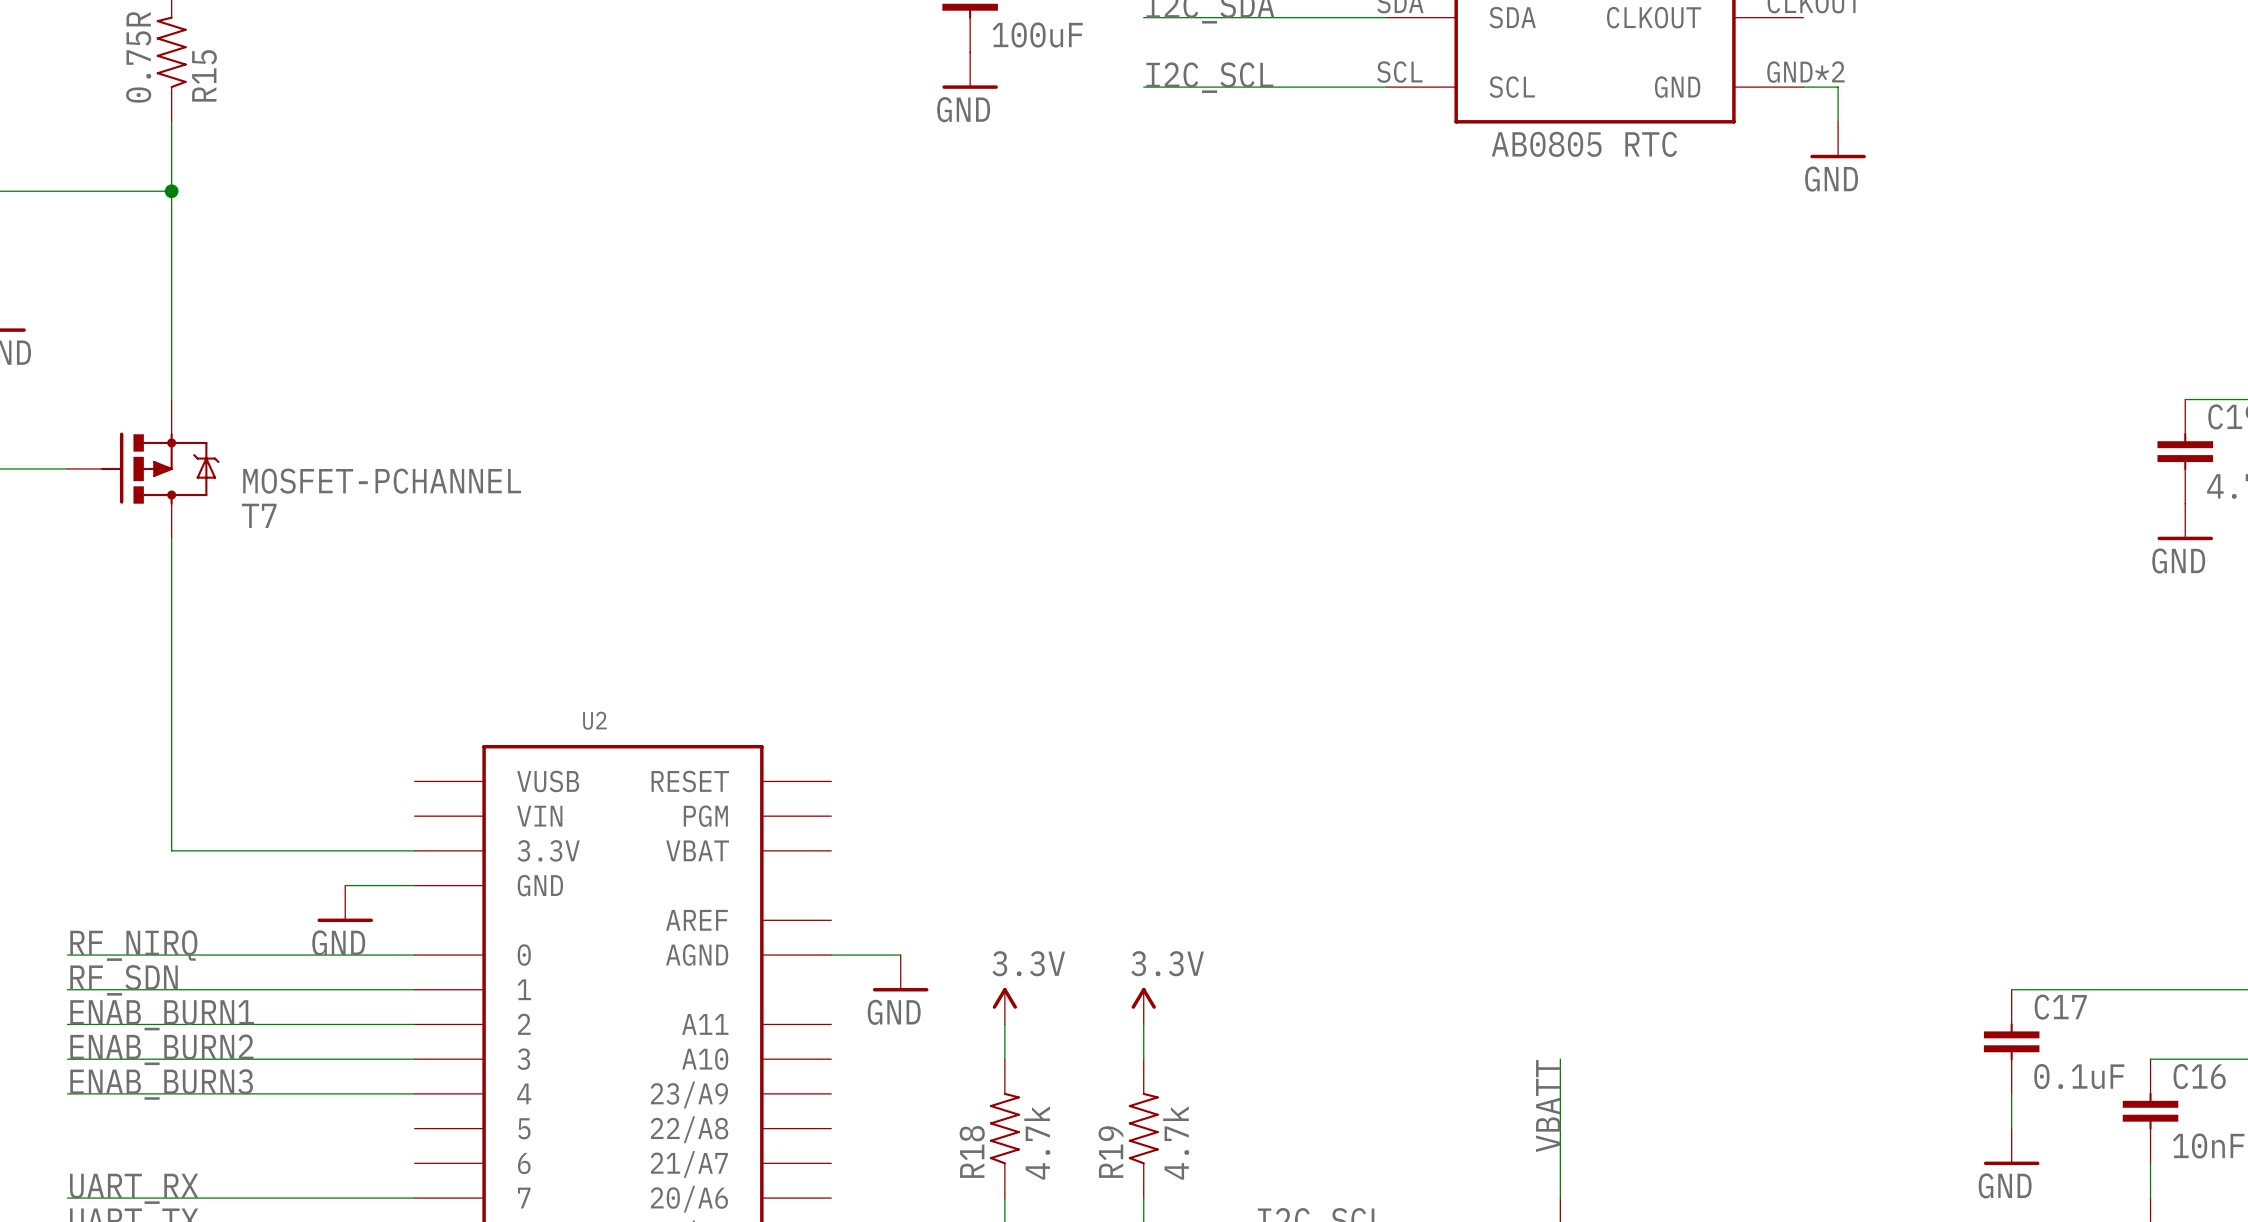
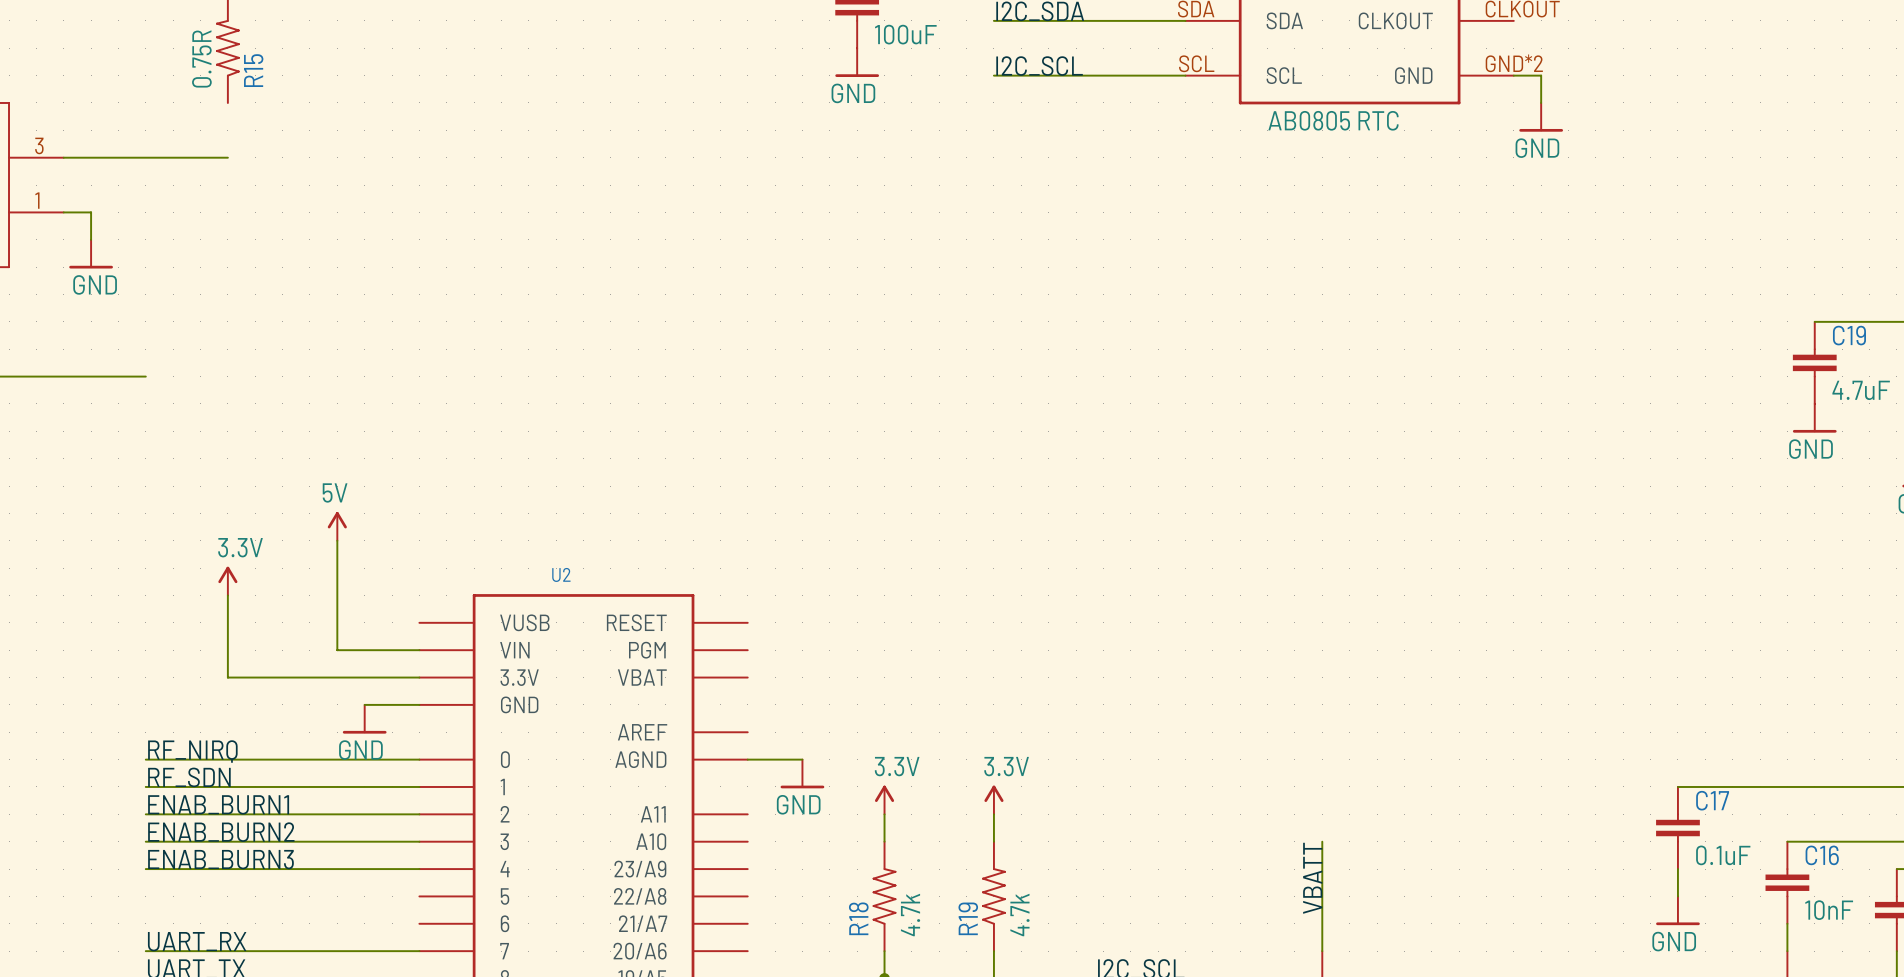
wire: (171, 121) (171, 399) -> none
junction: (171, 191) -> none
T7: MOSFET-PCHANNEL (143, 468) -> none
wire: (171, 538) (171, 746) -> none
power symbol: none -> 5V (337, 526)
wire: none -> (337, 540) (337, 650) (419, 650)
power symbol: none -> 3.3V (227, 581)

